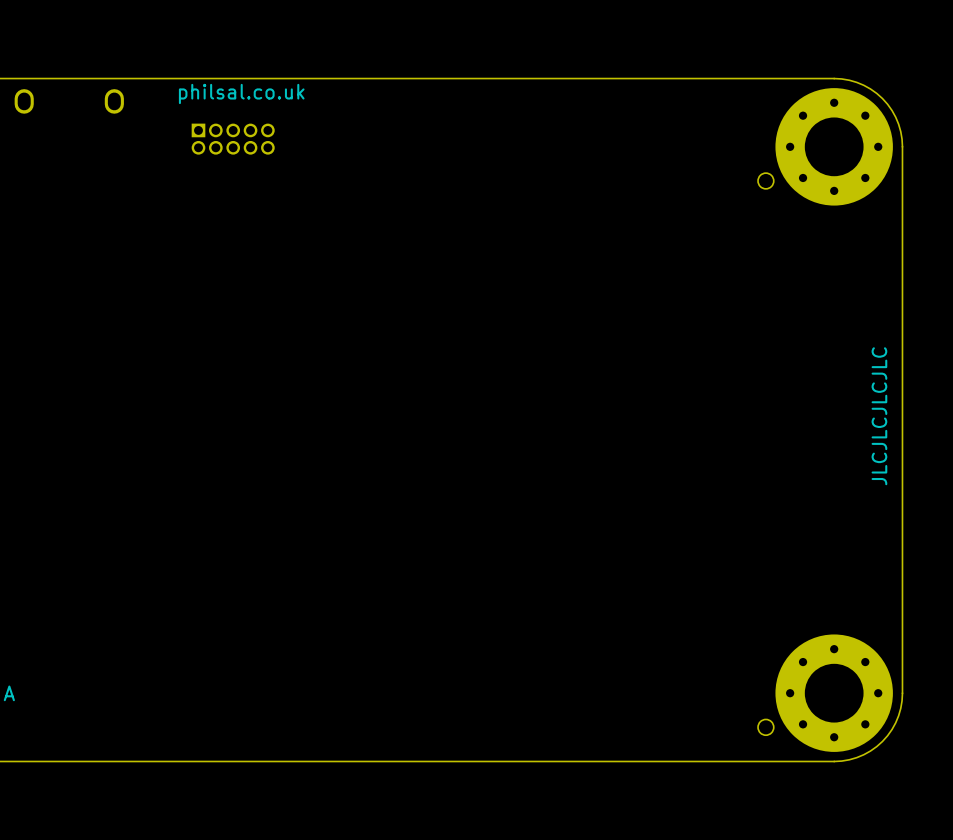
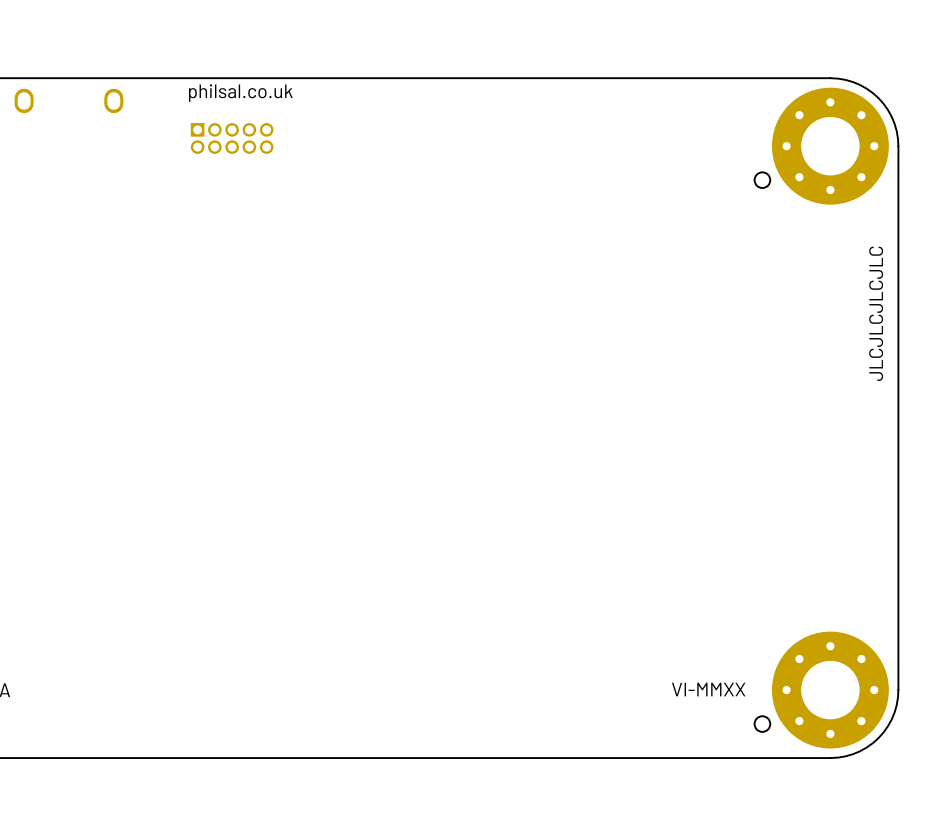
text position: JLCJLCJLCJLC (879, 416) -> JLCJLCJLCJLC (876, 313)
text: none -> VI-MMXX (708, 689)

